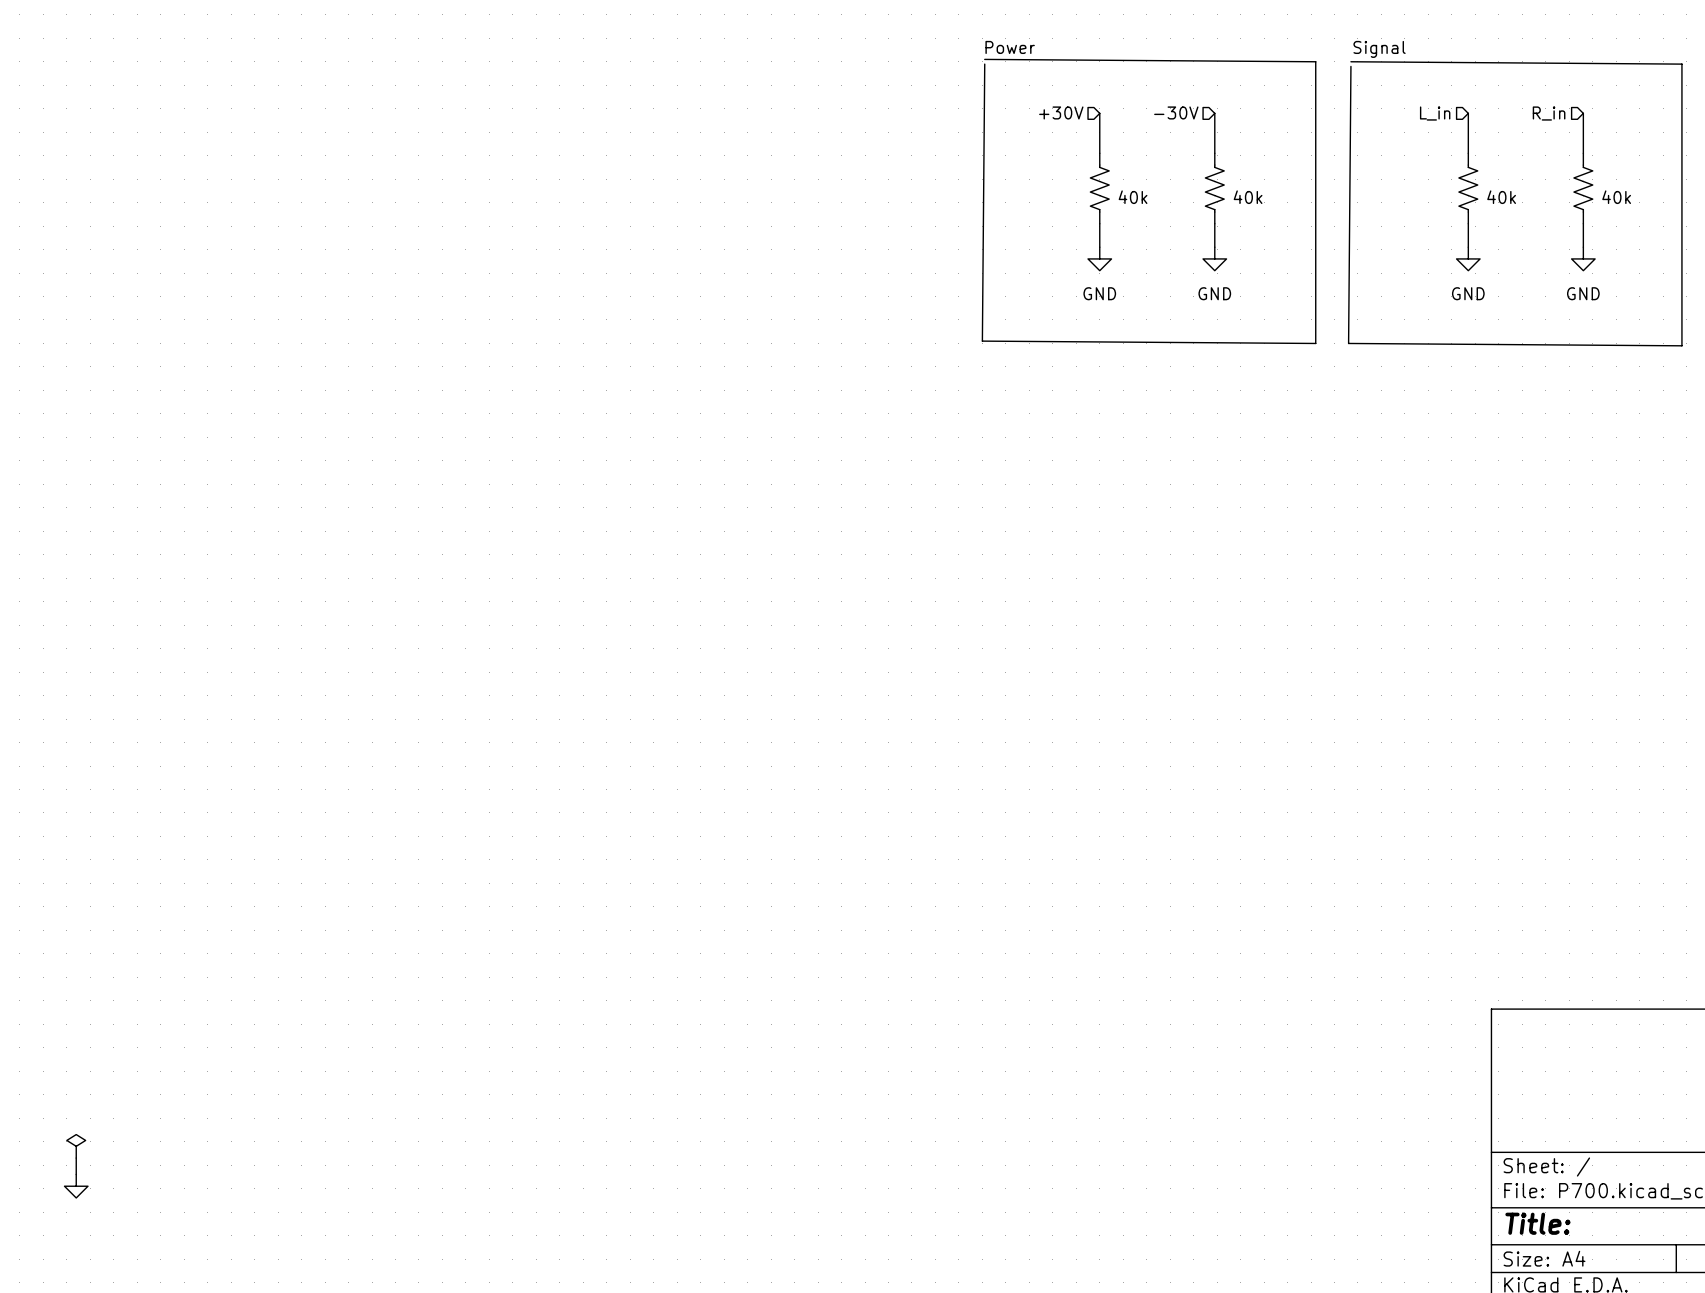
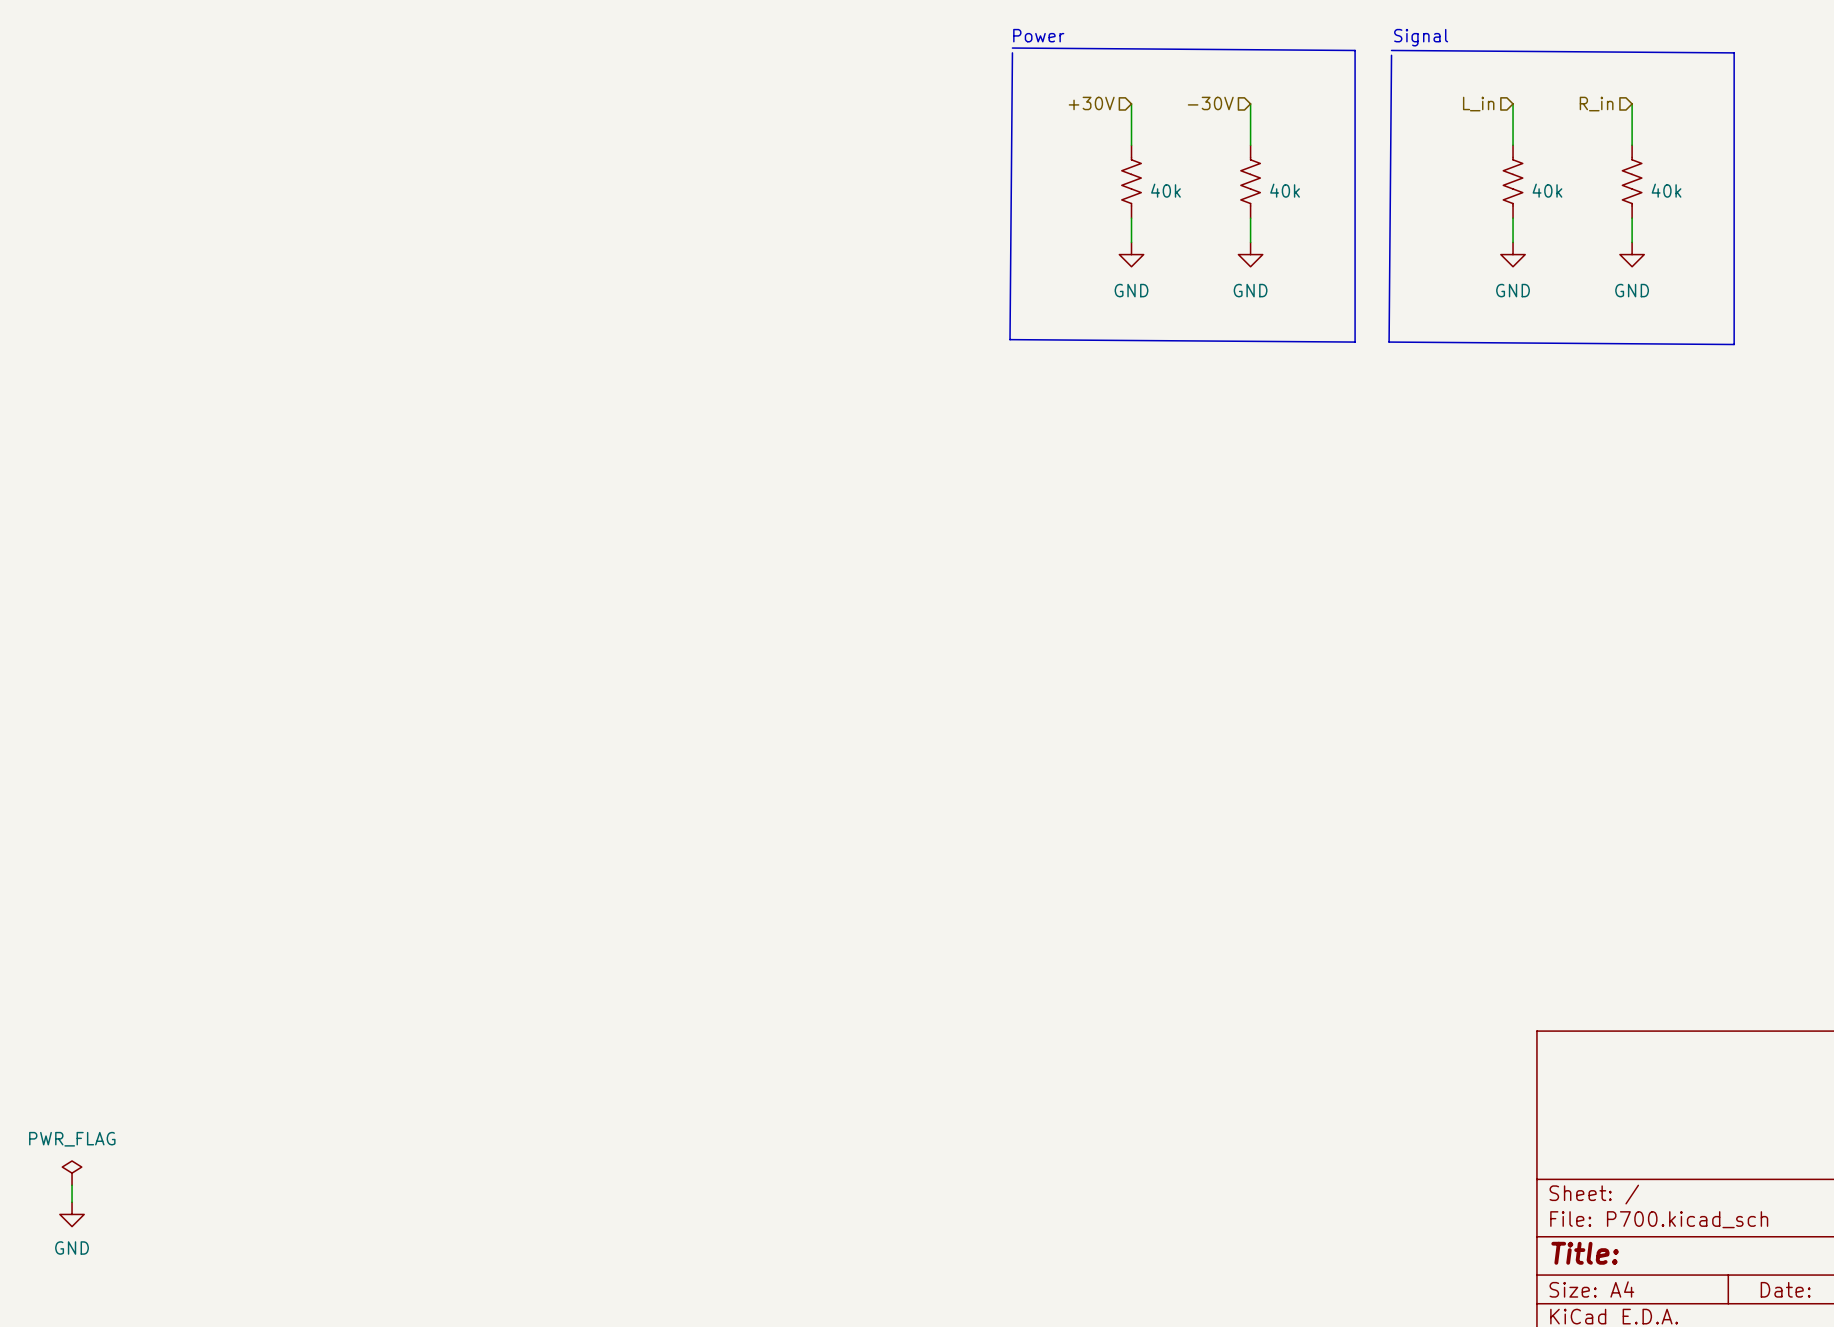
power symbol text: none -> PWR_FLAG (72, 1139)
power symbol text: none -> GND (72, 1248)

